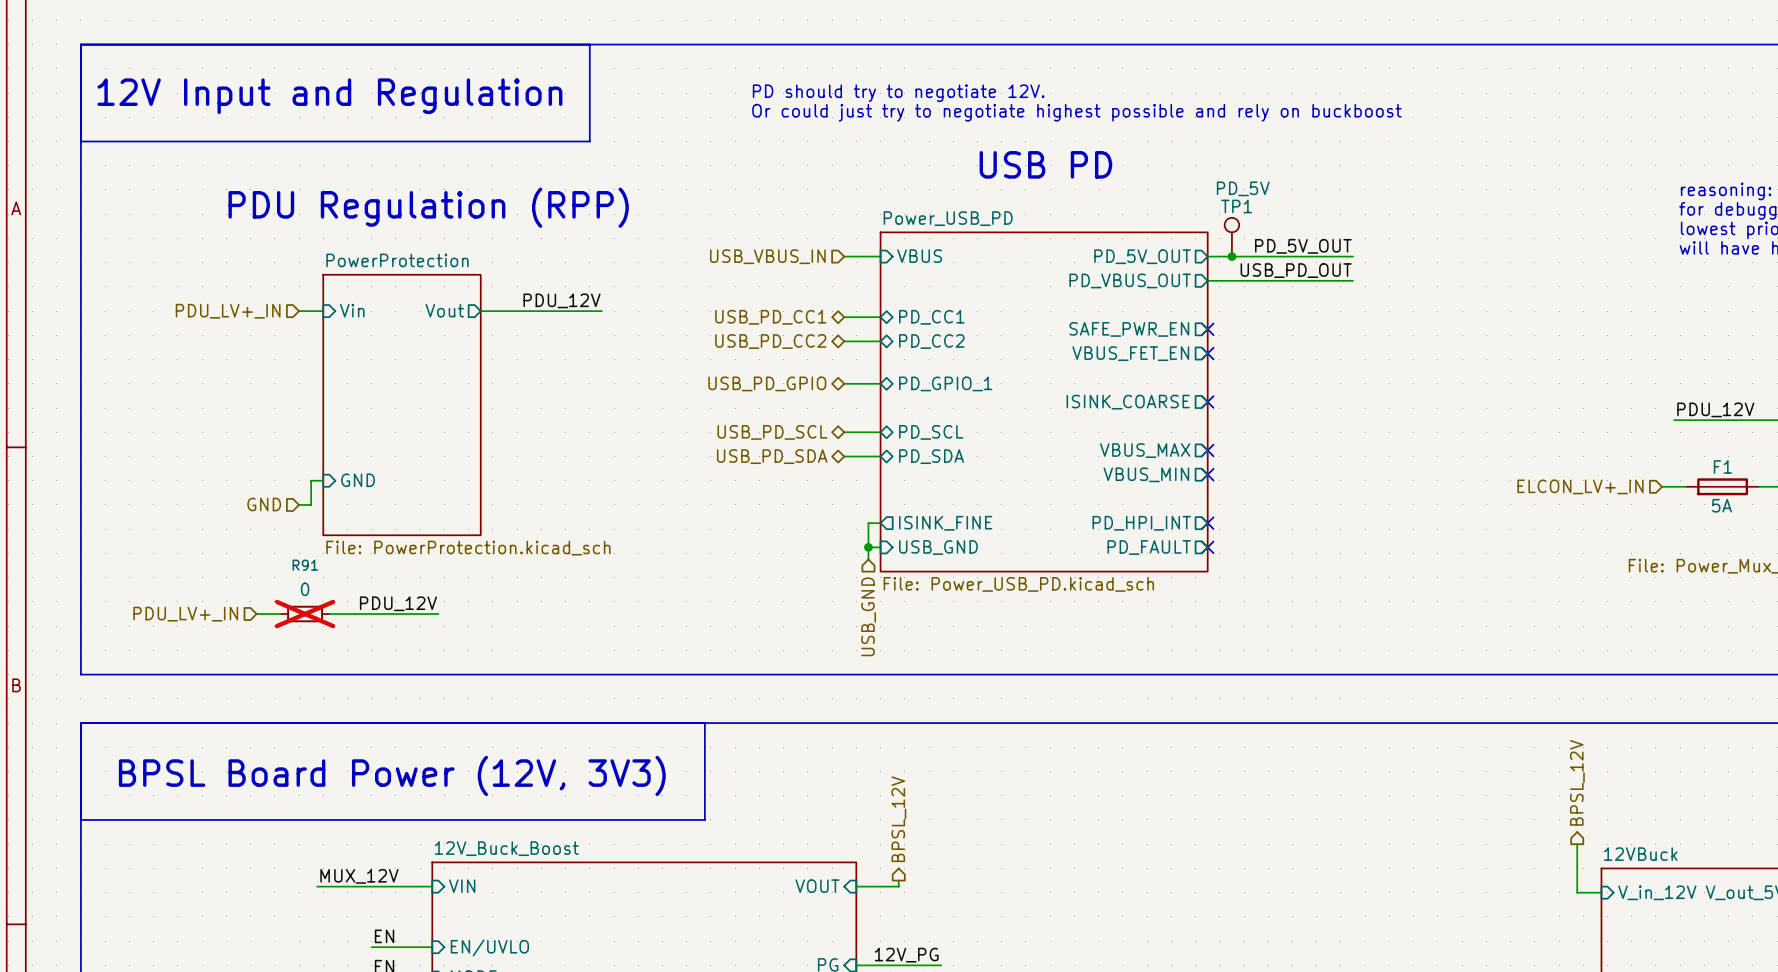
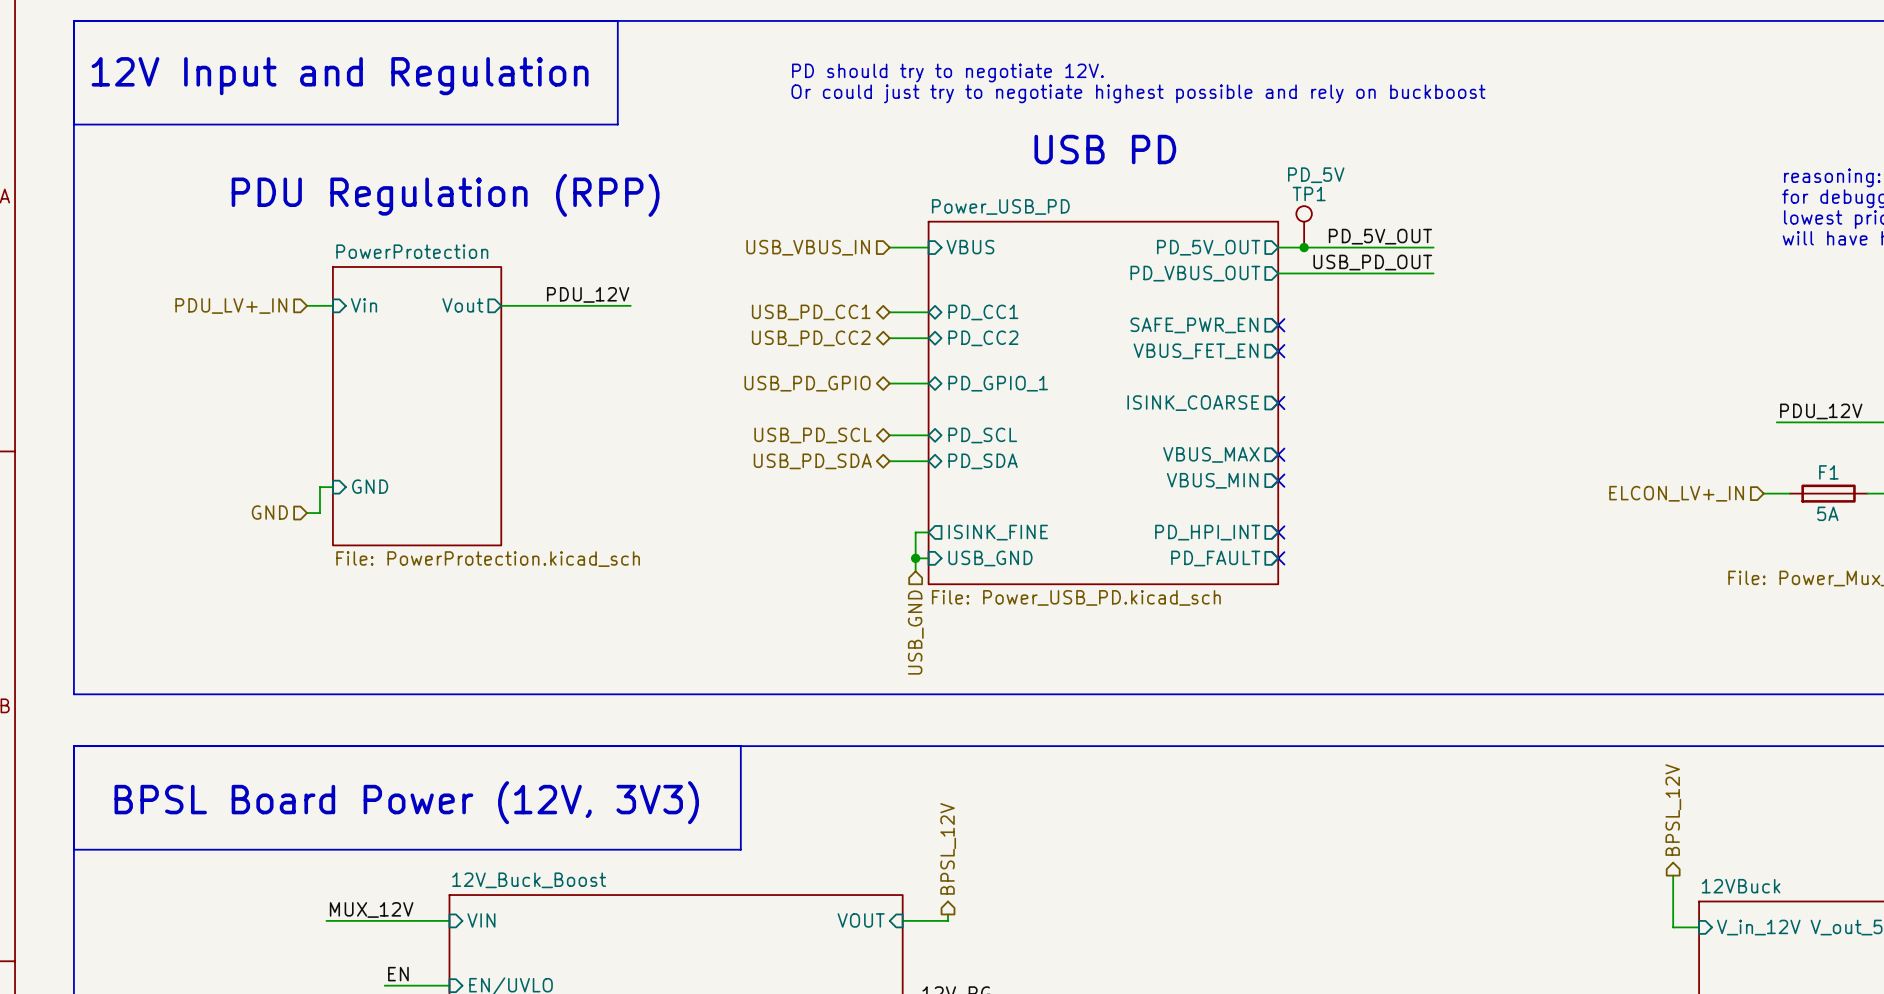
label: PDU_12V (398, 603) -> none
hierarchical label: PDU_LV+_IN (185, 614) -> none
wire: (256, 614) (280, 614) -> none
R91: 0 (305, 614) -> none
wire: (329, 614) (438, 614) -> none

